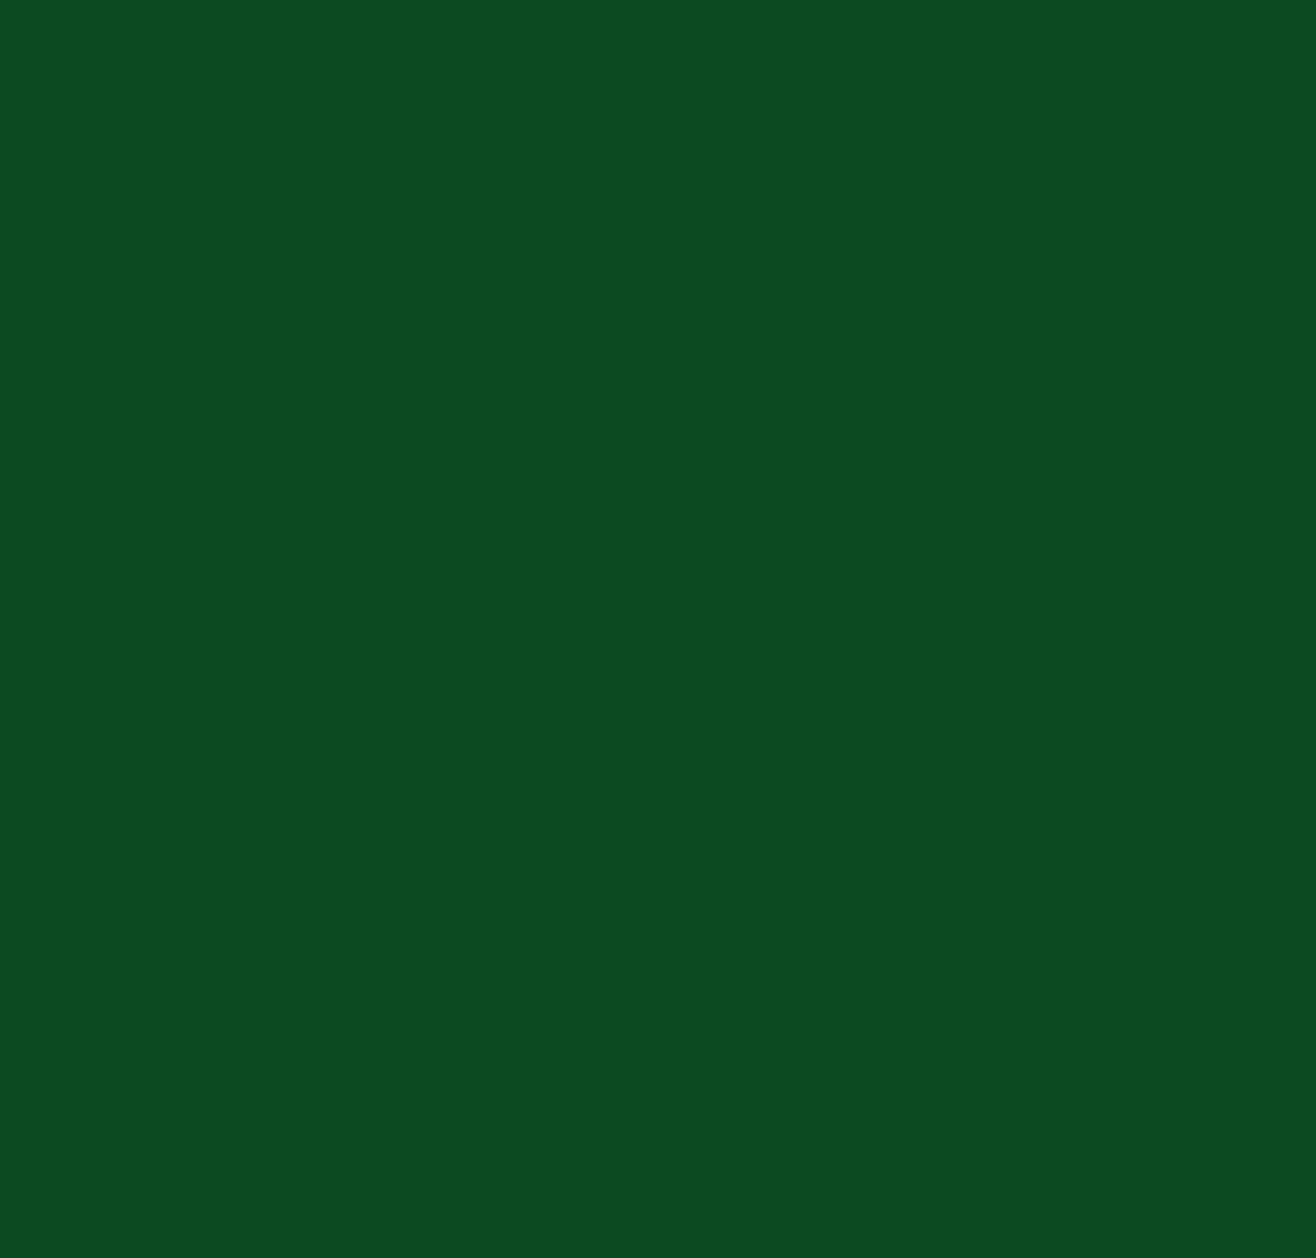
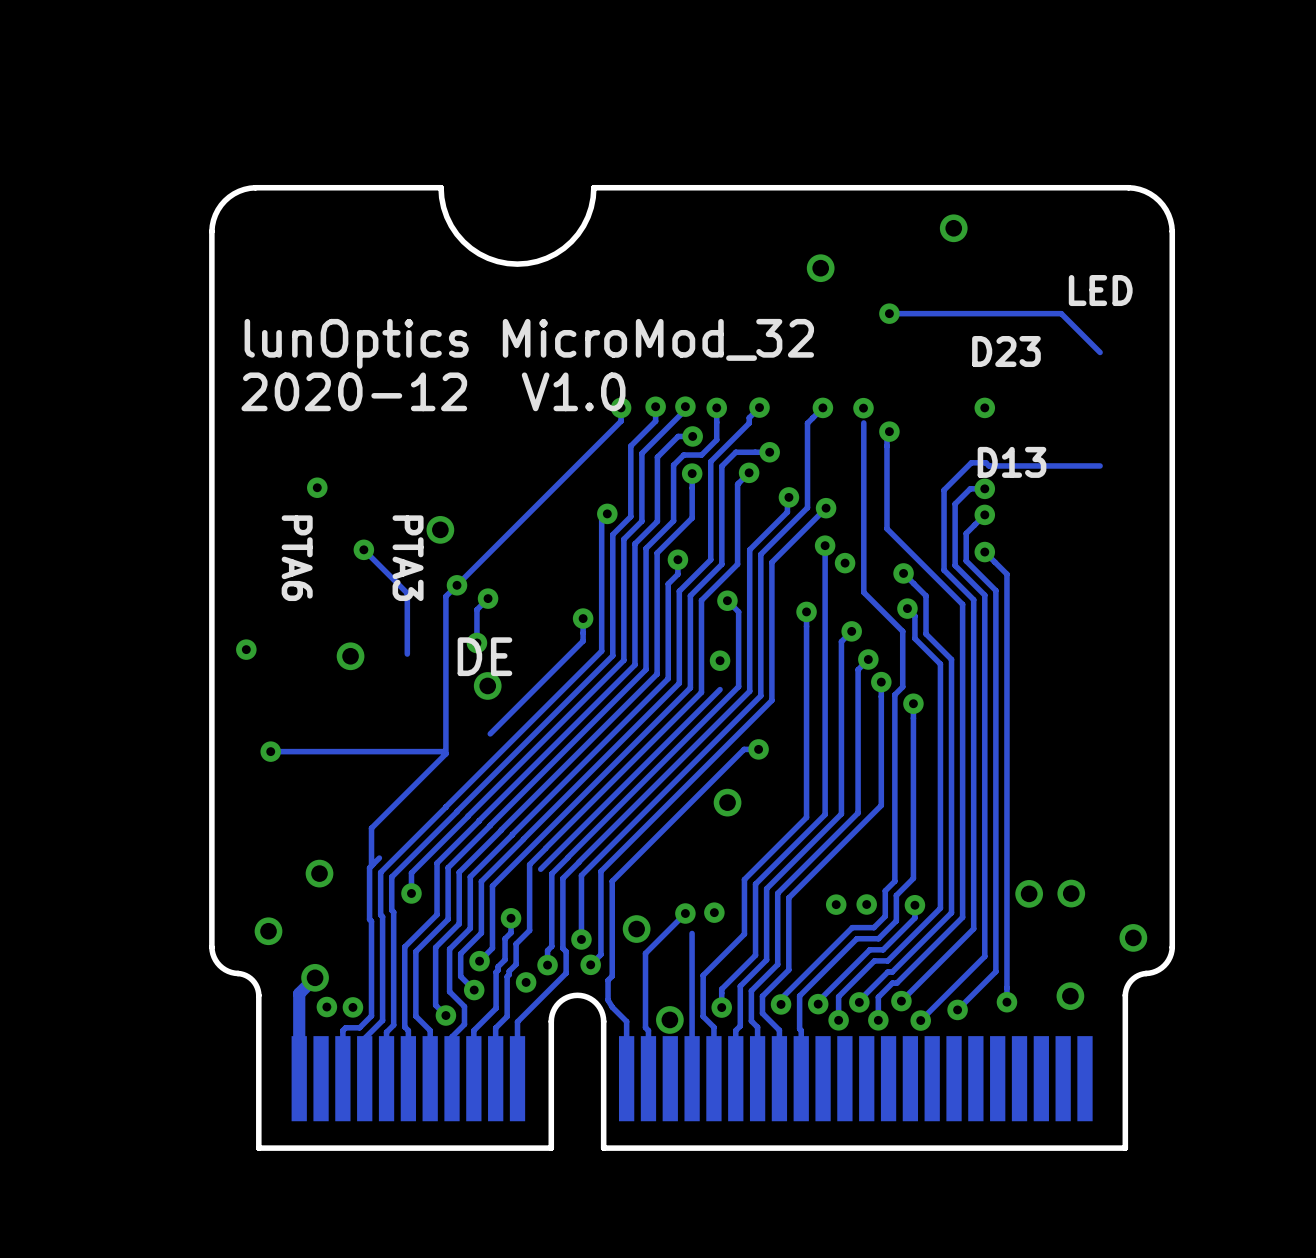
board edge: none -> (1128, 187) (593, 187) (588, 216) (571, 241) (546, 258) (517, 264) (488, 258) (463, 241) (446, 216) (441, 187) (255, 187) (238, 191) (224, 200) (215, 214) (211, 231) (211, 947) (214, 957) (219, 965) (228, 971) (248, 976) (254, 982) (258, 989) (258, 1148) (551, 1148) (551, 1018) (554, 1008) (561, 1000) (577, 995) (593, 1000) (600, 1008) (603, 1018) (603, 1148) (1125, 1148) (1126, 989) (1135, 976) (1155, 971) (1164, 965) (1170, 957) (1172, 947) (1172, 231) (1168, 214) (1159, 200) (1145, 191) (1128, 187)
via: none -> (953, 228)
via: none -> (820, 268)
text: none -> LED (1100, 290)
track: none -> (889, 313) (1061, 313) (1100, 352)
via: none -> (889, 313)
text: none -> lunOptics MicroMod_32 (529, 343)
text: none -> D23 (1006, 351)
text: none -> 2020-12 V1.0 (433, 391)
track: none -> (655, 406) (655, 421) (630, 446) (630, 516) (612, 534) (612, 655) (456, 811)
via: none -> (655, 406)
track: none -> (685, 406) (685, 409) (641, 453) (641, 521) (623, 539) (623, 660) (411, 873) (411, 893)
via: none -> (685, 406)
track: none -> (621, 407) (621, 421) (445, 596) (445, 753)
via: none -> (621, 407)
track: none -> (716, 407) (716, 439) (701, 455) (683, 455) (673, 465) (673, 520) (646, 548) (646, 669) (448, 867) (448, 919) (415, 951) (415, 1016) (430, 1030) (430, 1078)
via: none -> (716, 407)
track: none -> (759, 407) (749, 417) (749, 423) (710, 461) (710, 559) (679, 591) (679, 683) (523, 839)
via: none -> (759, 407)
track: none -> (822, 407) (807, 423) (807, 507) (760, 554) (760, 695) (581, 875) (581, 939)
via: none -> (822, 407)
via: none -> (984, 407)
via: none -> (863, 408)
track: none -> (863, 422) (863, 592) (902, 631) (902, 686) (894, 694) (894, 881) (885, 890) (885, 916) (873, 927) (852, 927) (781, 998) (781, 1004)
track: none -> (886, 431) (886, 528) (962, 604) (962, 917) (896, 983) (892, 983) (878, 997) (878, 1020)
via: none -> (889, 431)
track: none -> (692, 436) (678, 436) (657, 457) (657, 521) (634, 543) (634, 664) (437, 863) (437, 914) (404, 946) (404, 1026) (408, 1030) (408, 1078)
via: none -> (692, 436)
track: none -> (769, 452) (735, 452) (721, 466) (721, 564) (690, 595) (690, 687) (492, 886) (492, 948) (479, 961)
via: none -> (769, 452)
text: none -> D13 (1012, 462)
track: none -> (1100, 465) (989, 465) (985, 462) (971, 462) (944, 490) (944, 570) (973, 599) (973, 928) (901, 1001)
track: none -> (749, 472) (737, 484) (737, 564) (701, 600) (701, 692) (545, 848)
via: none -> (749, 472)
track: none -> (692, 473) (692, 518) (657, 553) (657, 674) (459, 872) (459, 923) (435, 947) (435, 1005) (445, 1015)
via: none -> (692, 473)
via: none -> (317, 487)
track: none -> (984, 488) (970, 488) (955, 504) (955, 565) (984, 595) (984, 956) (920, 1020)
via: none -> (984, 488)
track: none -> (788, 497) (787, 512) (749, 549) (749, 691) (562, 878) (562, 948) (566, 951) (566, 973) (517, 1021) (517, 1078)
via: none -> (788, 497)
track: none -> (826, 508) (771, 562) (771, 700) (600, 871) (600, 954) (590, 964)
via: none -> (826, 508)
track: none -> (607, 513) (601, 519) (601, 651) (380, 872) (382, 1020) (364, 1038) (364, 1078)
via: none -> (607, 513)
track: none -> (984, 514) (966, 533) (966, 560) (995, 590) (995, 971) (957, 1009)
via: none -> (984, 514)
via: none -> (440, 529)
track: none -> (825, 545) (825, 814) (755, 884) (755, 955) (721, 989) (721, 1007)
via: none -> (825, 545)
track: none -> (363, 549) (407, 593) (407, 654)
via: none -> (363, 549)
track: none -> (984, 552) (1006, 574) (1006, 1002)
via: none -> (984, 552)
text: none -> PTA3 (408, 558)
text: none -> PTA6 (297, 558)
track: none -> (677, 559) (677, 574) (668, 583) (668, 678) (470, 876) (470, 928) (449, 949) (449, 991) (464, 1006) (464, 1024) (452, 1036) (452, 1078)
via: none -> (677, 559)
via: none -> (845, 563)
track: none -> (903, 573) (926, 595) (926, 634) (951, 659) (951, 912) (892, 972) (887, 972) (859, 1002)
via: none -> (903, 573)
via: none -> (457, 585)
track: none -> (488, 598) (476, 609) (476, 642)
via: none -> (488, 598)
track: none -> (727, 600) (738, 611) (738, 686) (567, 857)
via: none -> (727, 600)
track: none -> (907, 608) (914, 616) (914, 638) (940, 664) (940, 908) (887, 960) (874, 960) (838, 996) (838, 1020)
via: none -> (907, 608)
track: none -> (806, 611) (806, 817) (744, 879) (744, 934) (703, 975) (703, 1016) (713, 1027) (713, 1078)
via: none -> (806, 611)
track: none -> (583, 618) (583, 641) (490, 733)
via: none -> (583, 618)
track: none -> (851, 631) (841, 641) (841, 813) (766, 888) (766, 959) (740, 986) (740, 1026) (735, 1030) (735, 1078)
via: none -> (851, 631)
via: none -> (476, 642)
via: none -> (246, 649)
via: none -> (350, 656)
text: none -> DE (484, 656)
track: none -> (868, 659) (858, 669) (858, 812) (777, 893) (777, 964) (751, 990) (751, 1021) (757, 1027) (757, 1078)
via: none -> (868, 659)
via: none -> (720, 660)
track: none -> (881, 682) (881, 805) (788, 897) (788, 969) (762, 996) (762, 1013) (779, 1030) (779, 1078)
via: none -> (881, 682)
via: none -> (487, 685)
track: none -> (720, 689) (540, 869)
track: none -> (913, 703) (913, 878) (896, 895) (896, 920) (878, 938) (856, 938) (799, 996) (801, 1078)
via: none -> (913, 703)
track: none -> (758, 749) (744, 749) (612, 881) (612, 976) (608, 980) (608, 999) (626, 1021) (626, 1078)
via: none -> (758, 749)
track: none -> (270, 751) (443, 751) (445, 753)
via: none -> (270, 751)
track: none -> (445, 753) (371, 828) (371, 865)
via: none -> (727, 802)
track: none -> (456, 811) (391, 877) (393, 1025) (386, 1032) (386, 1078)
track: none -> (523, 839) (481, 881) (481, 933) (460, 953) (460, 976) (474, 990)
track: none -> (545, 848) (529, 864) (529, 930) (516, 943) (516, 964) (509, 971) (507, 976) (507, 1016) (495, 1028) (495, 1078)
track: none -> (567, 857) (551, 873) (551, 946) (547, 950) (547, 965)
track: none -> (379, 858) (369, 867) (371, 1015) (359, 1027) (345, 1027) (342, 1030) (342, 1078)
via: none -> (319, 873)
via: none -> (411, 893)
via: none -> (1029, 893)
via: none -> (1071, 893)
via: none -> (836, 904)
via: none -> (866, 904)
track: none -> (914, 905) (914, 918) (883, 949) (869, 949) (818, 1001)
via: none -> (914, 905)
via: none -> (714, 912)
track: none -> (685, 913) (645, 953) (645, 1027) (648, 1030) (648, 1078)
via: none -> (685, 913)
track: none -> (511, 918) (511, 932) (505, 938) (505, 959) (498, 966) (496, 972) (496, 1008) (473, 1030) (473, 1078)
via: none -> (511, 918)
via: none -> (636, 929)
via: none -> (268, 931)
track: none -> (692, 933) (692, 1078)
via: none -> (1133, 937)
via: none -> (581, 939)
via: none -> (479, 961)
via: none -> (590, 964)
via: none -> (547, 965)
track: none -> (315, 977) (299, 993) (299, 1078)
via: none -> (315, 977)
via: none -> (526, 982)
via: none -> (474, 990)
via: none -> (1070, 996)
via: none -> (901, 1001)
via: none -> (859, 1002)
via: none -> (1006, 1002)
via: none -> (781, 1004)
via: none -> (818, 1004)
via: none -> (326, 1007)
via: none -> (352, 1007)
via: none -> (721, 1007)
via: none -> (957, 1009)
via: none -> (445, 1015)
via: none -> (669, 1019)
via: none -> (838, 1020)
via: none -> (878, 1020)
via: none -> (920, 1020)
part: none -> (692, 1078)

